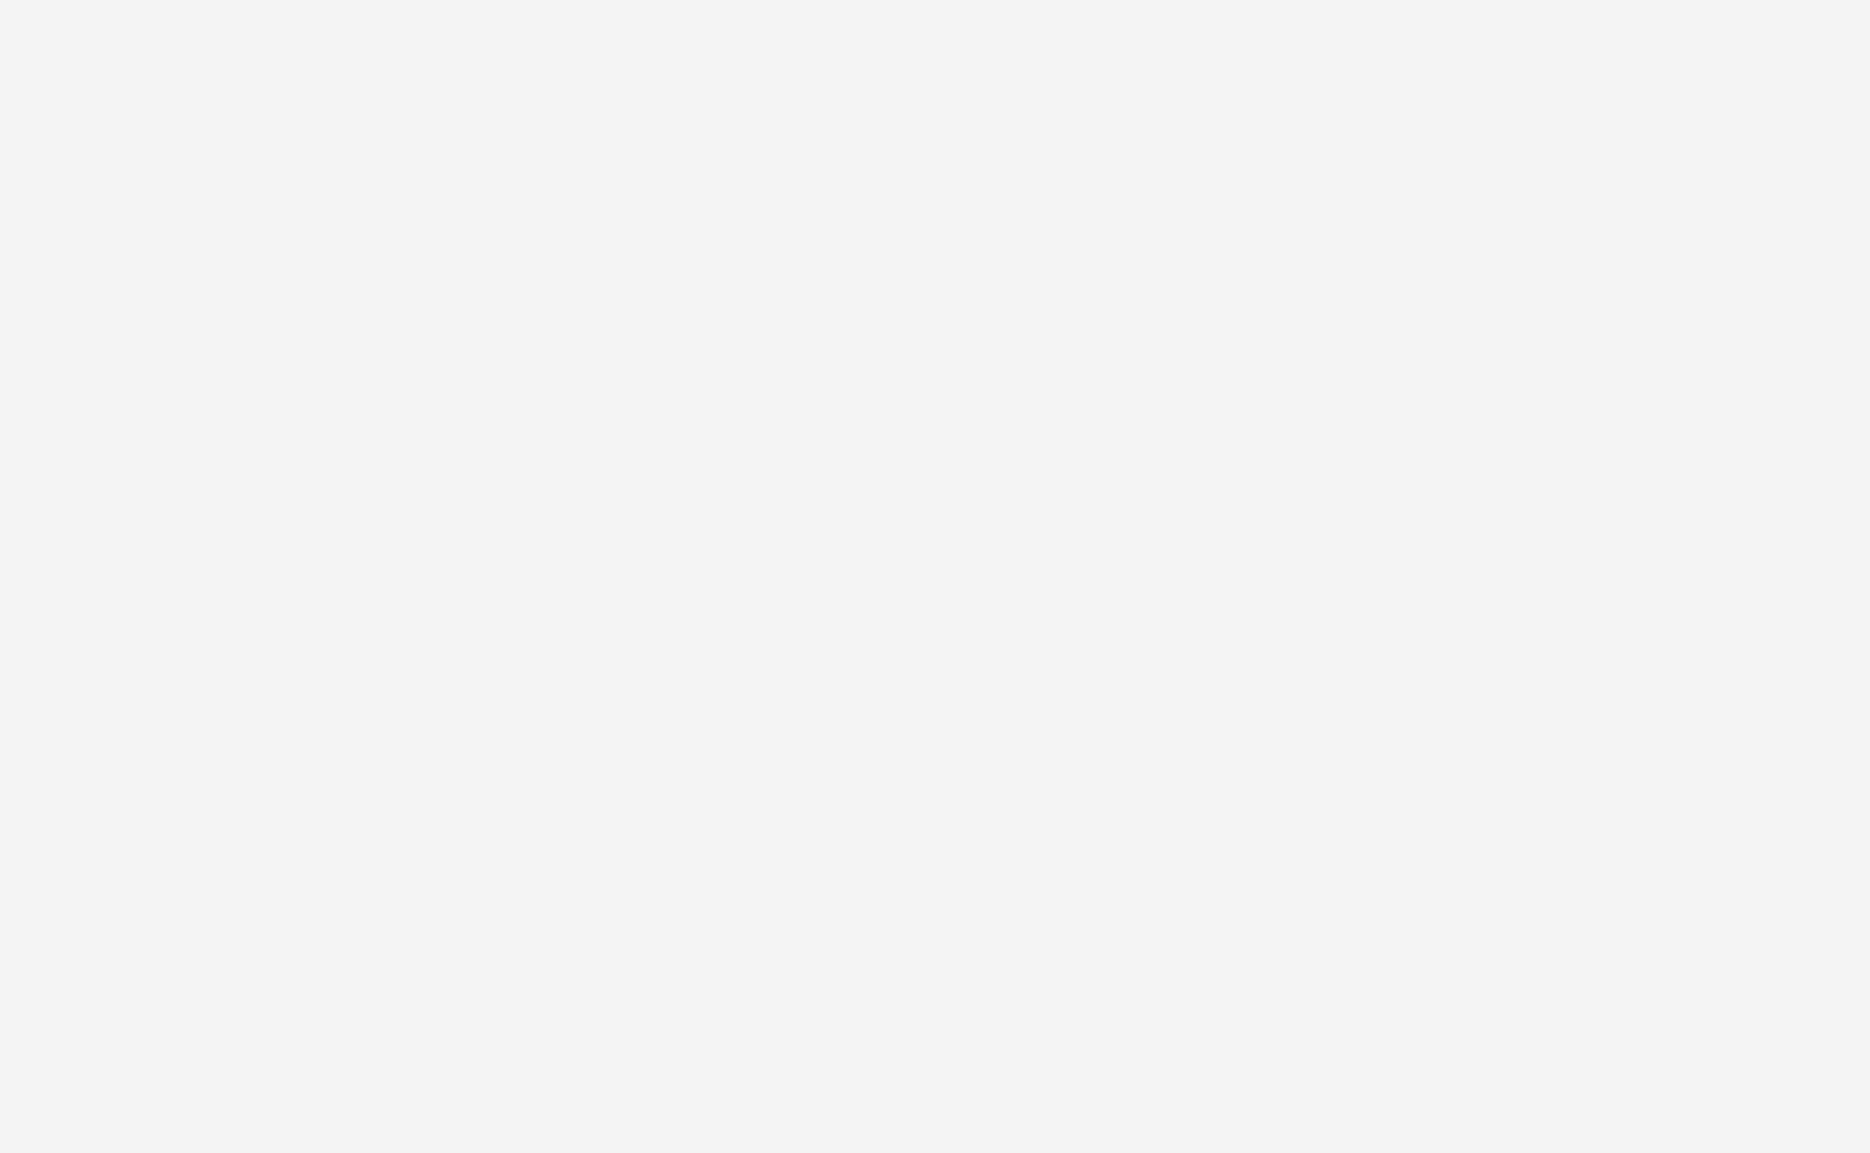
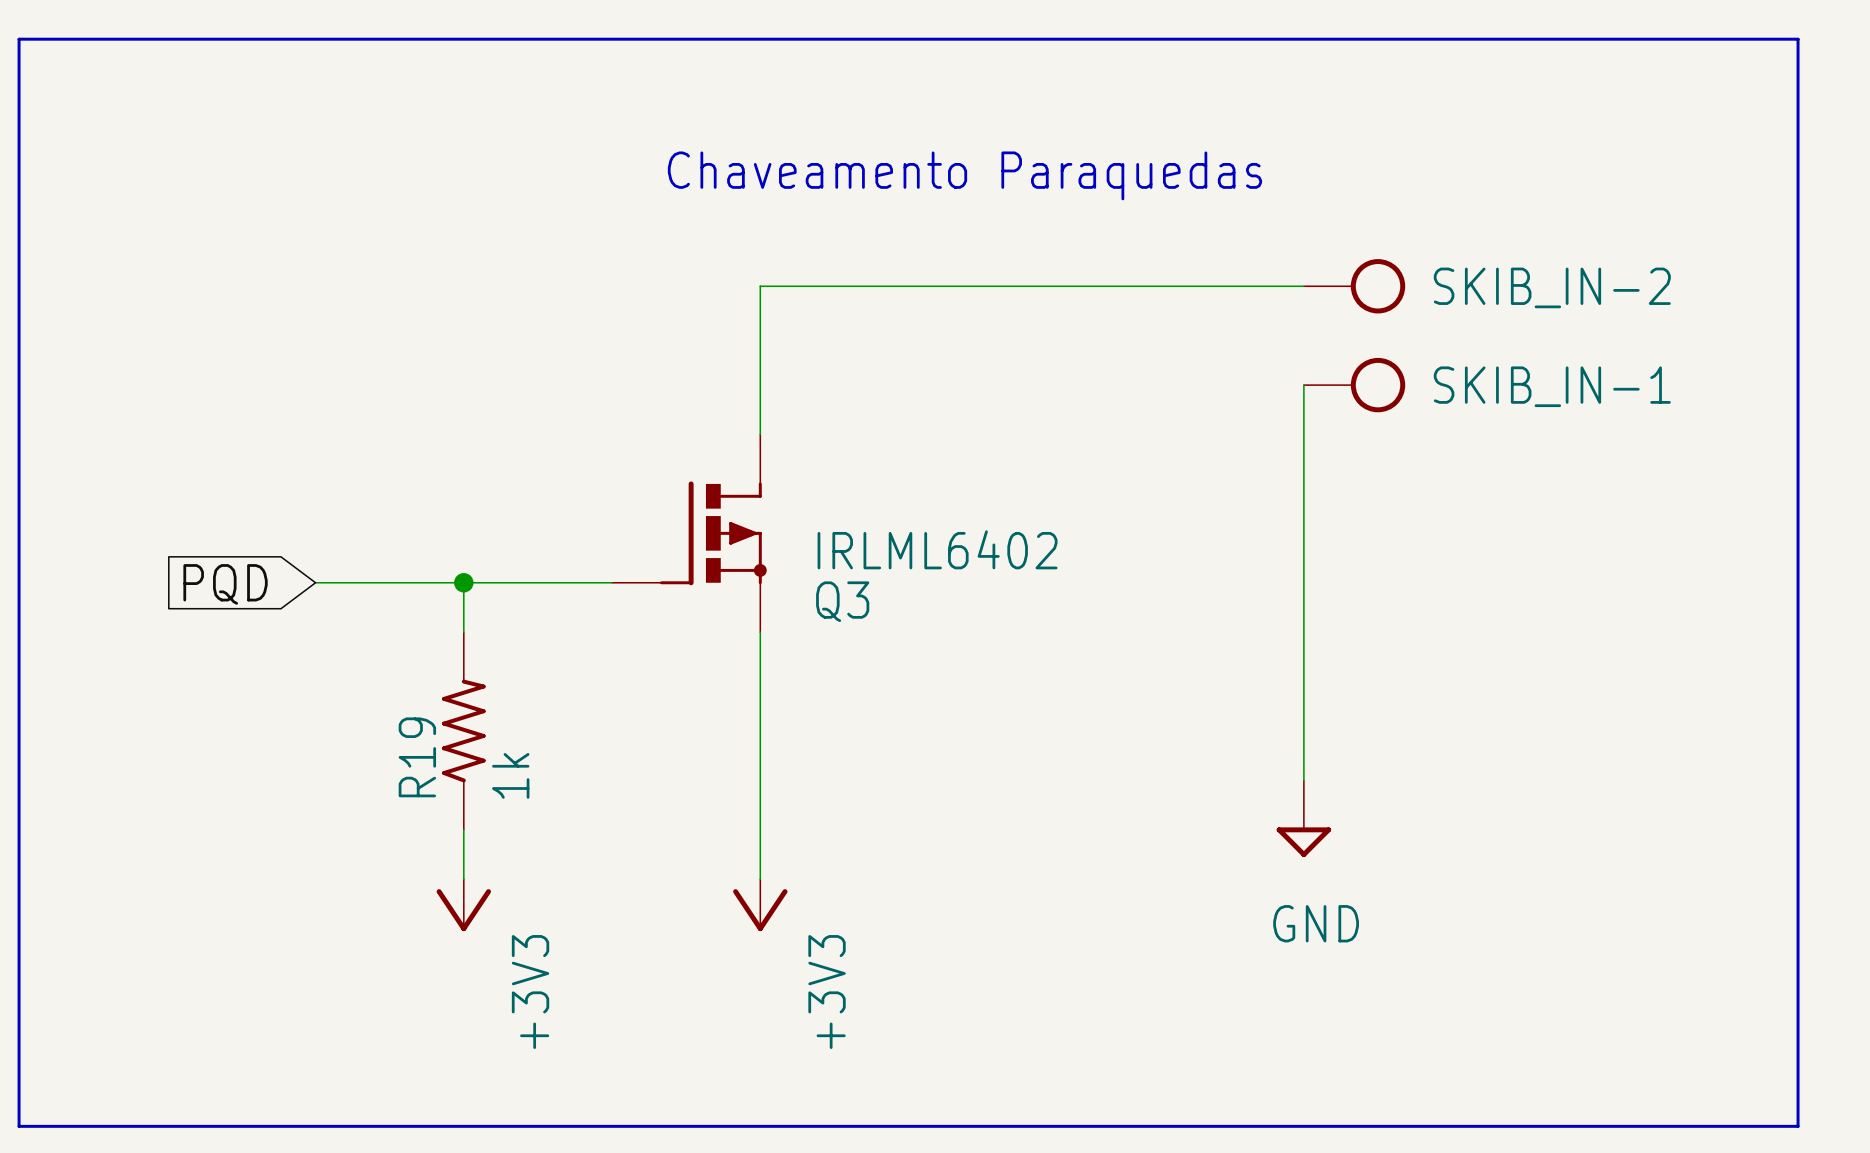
line: none -> (19, 39) (19, 1126) (1798, 1126) (1798, 39) (19, 39)
text: none -> Chaveamento Paraquedas (964, 175)
wire: none -> (1303, 286) (760, 286) (760, 434)
SKIB_IN-2: none -> (1354, 286)
wire: none -> (1303, 385) (1303, 780)
SKIB_IN-1: none -> (1354, 385)
Q3: none -> IRLML6402 (689, 533)
wire: none -> (315, 582) (612, 582)
wire: none -> (463, 582) (463, 632)
junction: none -> (463, 582)
global label: none -> PQD (225, 584)
wire: none -> (760, 632) (760, 879)
R19: none -> 1k (463, 731)
power symbol: none -> GND (1303, 818)
wire: none -> (463, 829) (463, 879)
power symbol: none -> +3V3 (463, 905)
power symbol: none -> +3V3 (760, 905)

